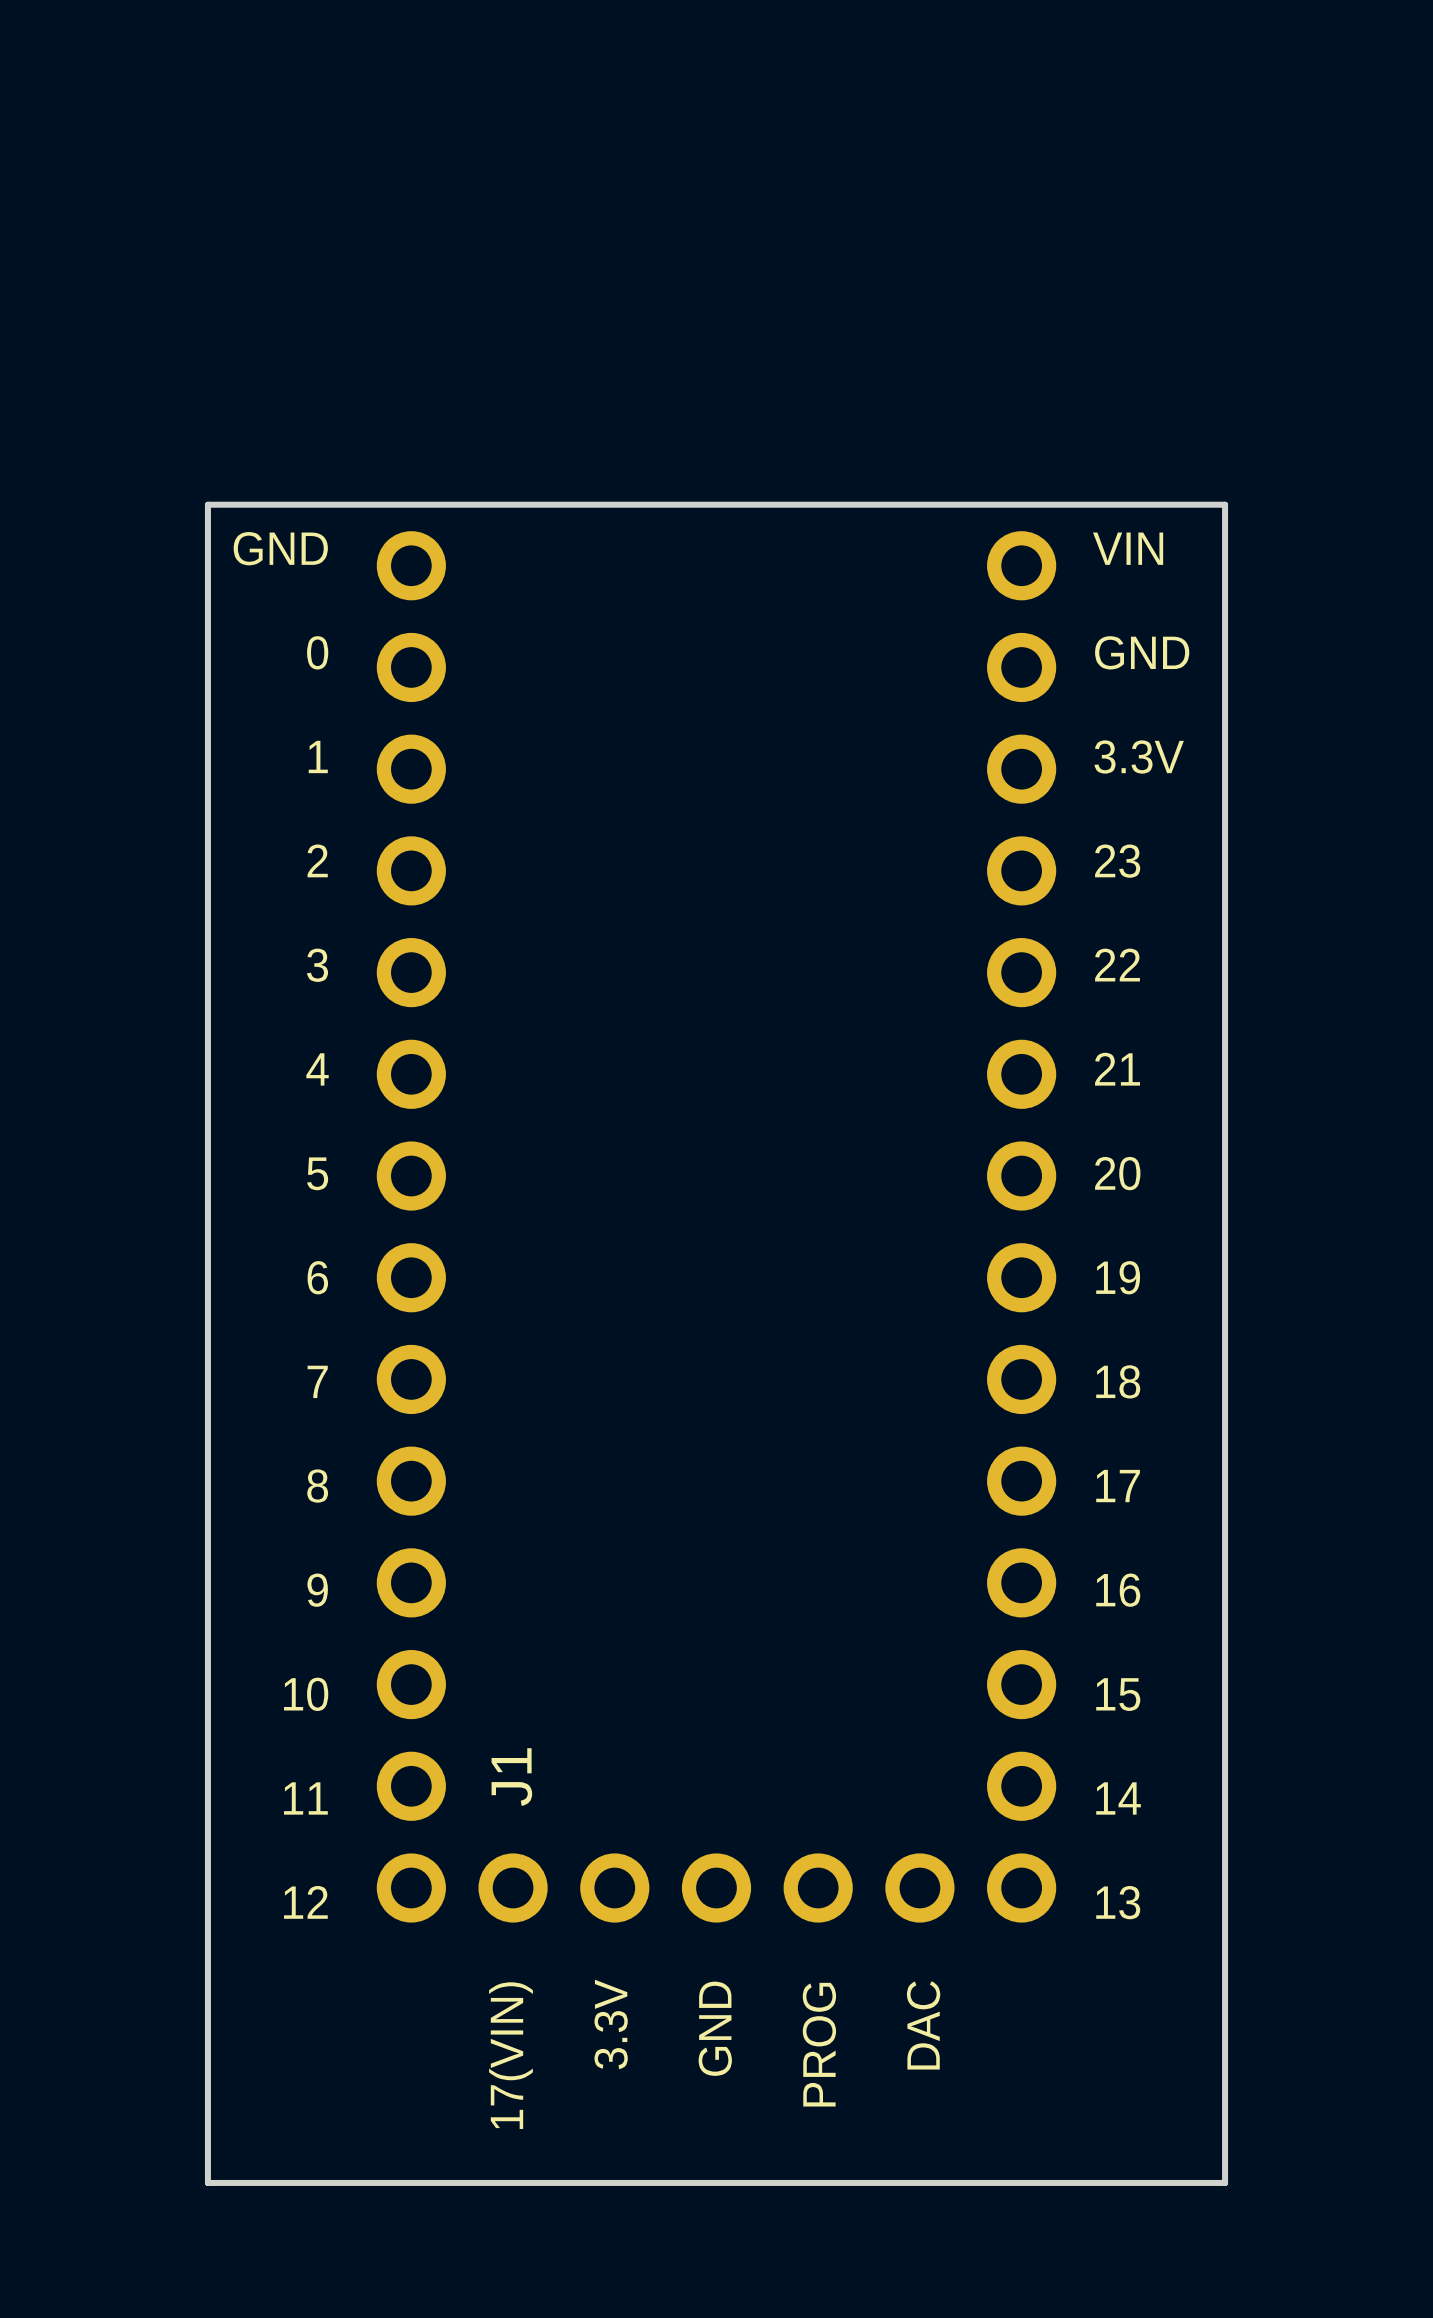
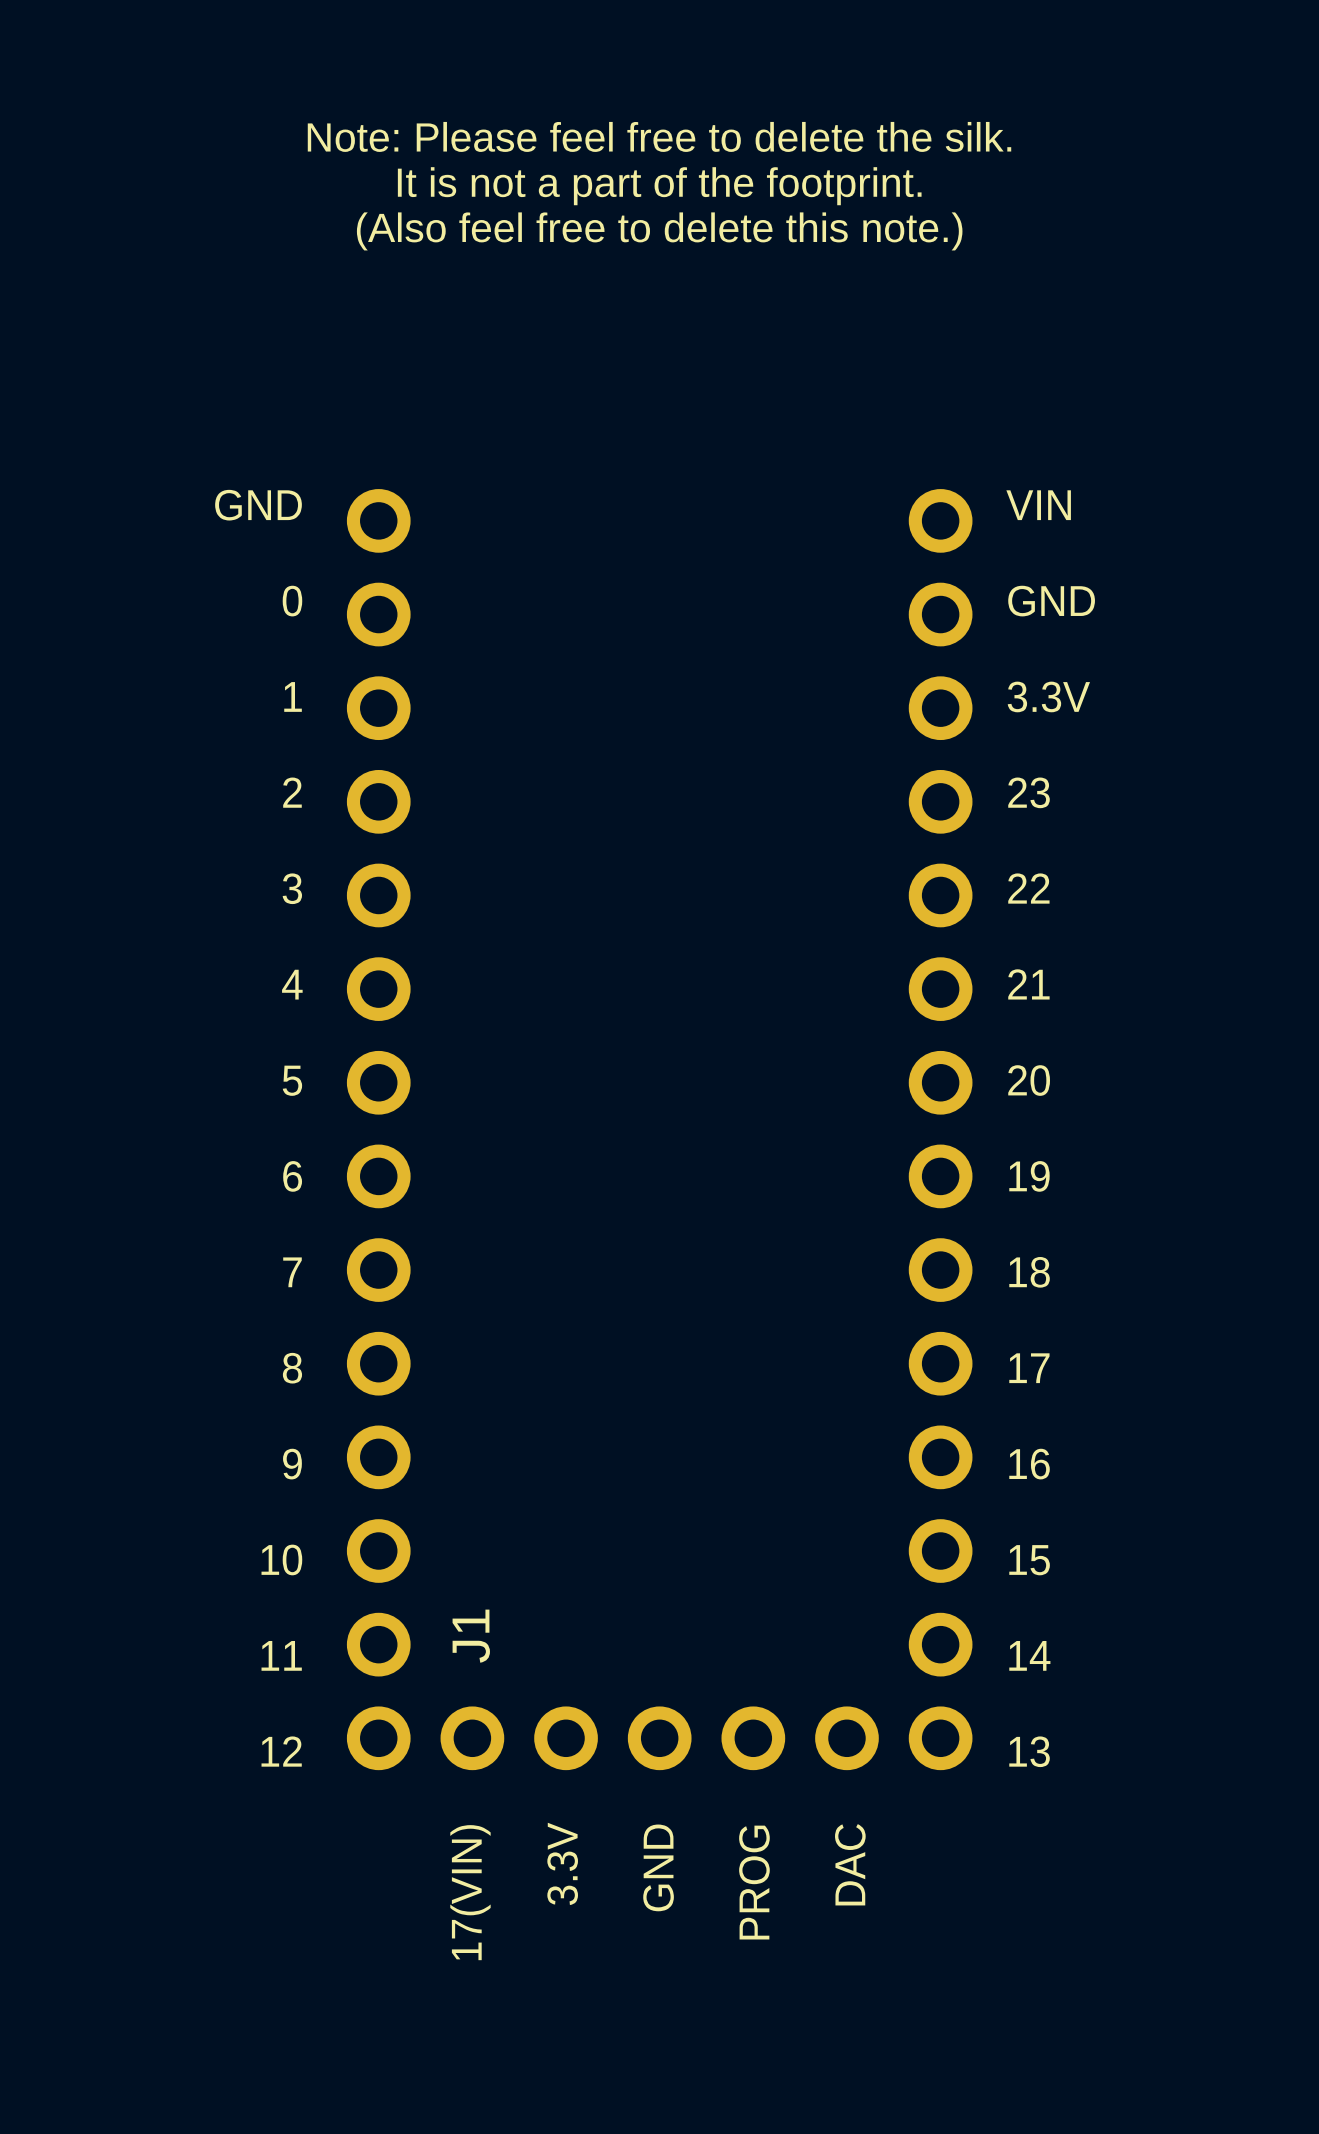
text: none -> Note: Please feel free to delete the silk. (659, 136)
text: none -> It is not a part of the footprint. (659, 186)
text: none -> (Also feel free to delete this note.) (659, 231)
board edge: (207, 504) (207, 2182) (1225, 2182) (1225, 504) (207, 504) -> none

